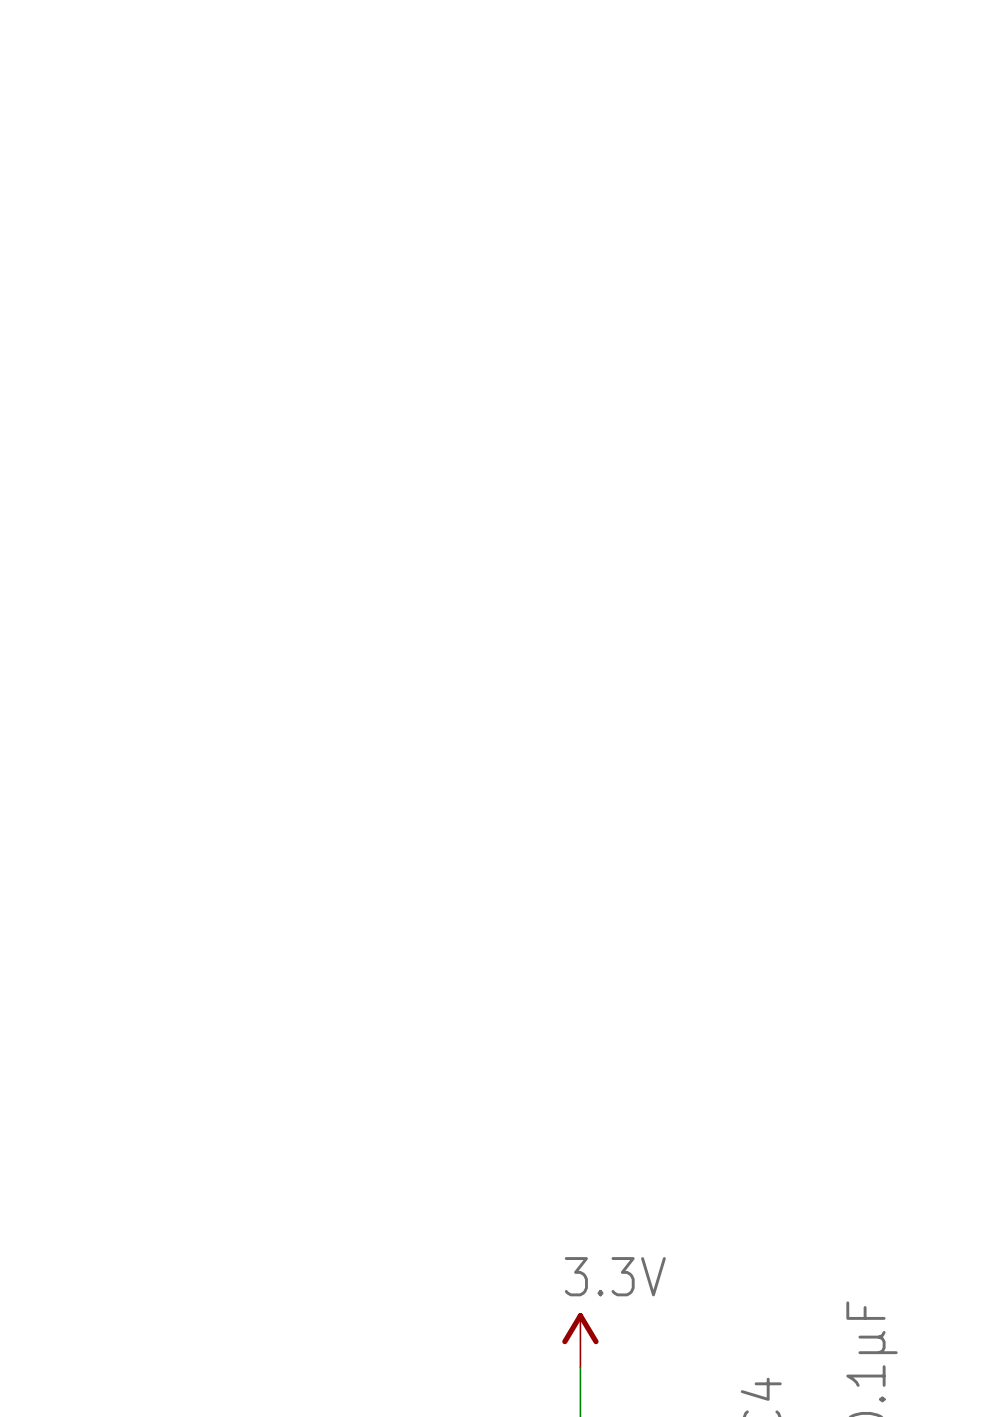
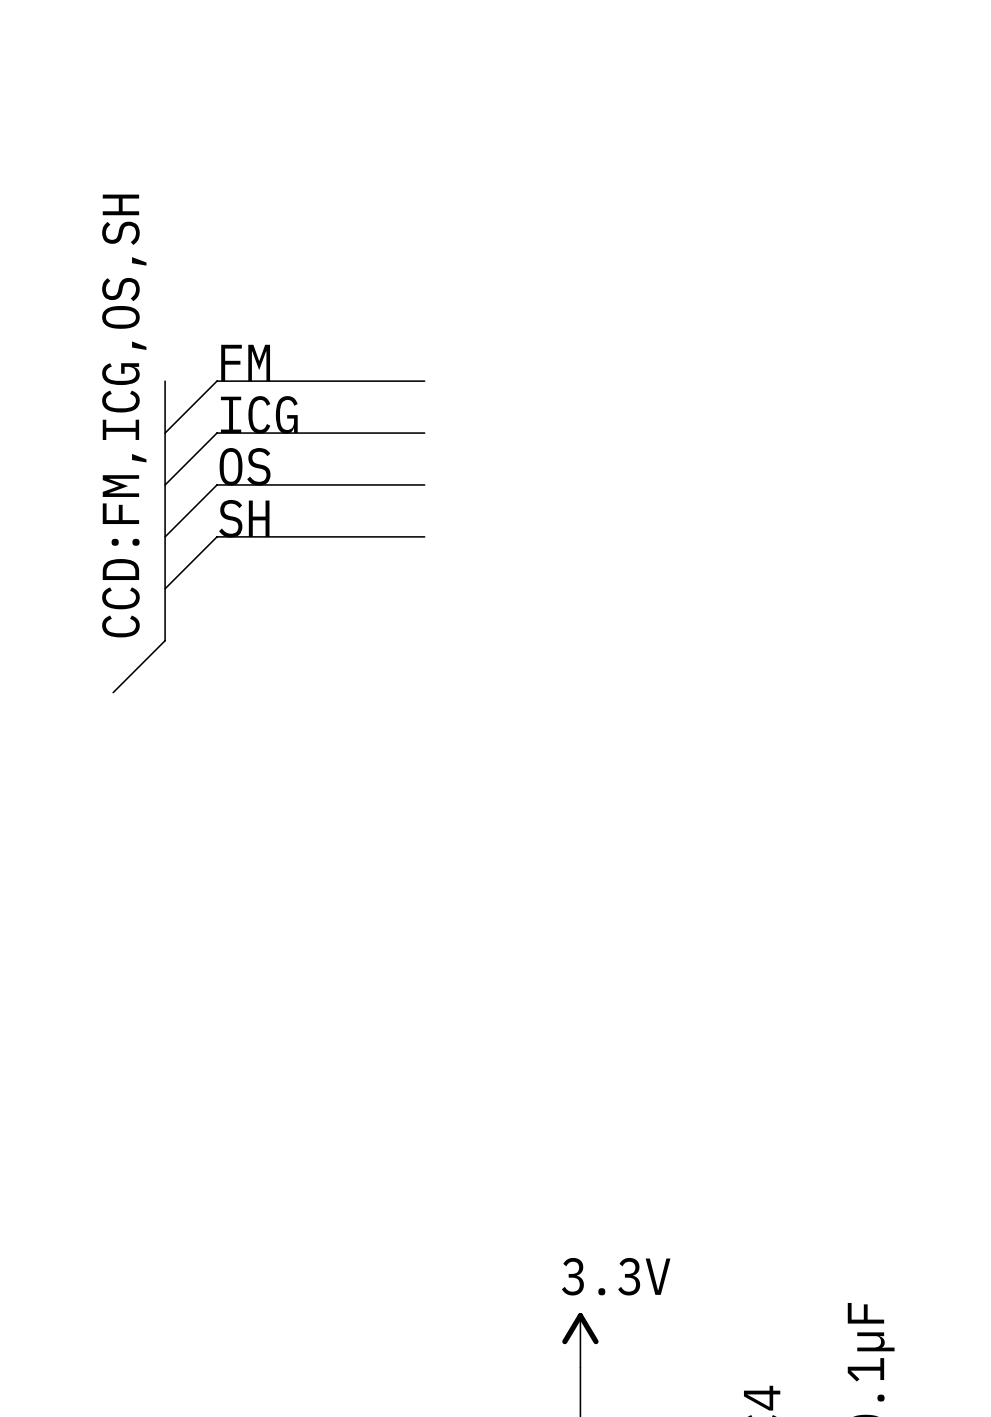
label: none -> FM (245, 362)
bus: none -> (165, 381) (165, 640) (113, 692)
wire: none -> (424, 381) (216, 381) (165, 433)
label: none -> ICG (259, 414)
label: none -> CCD:FM,ICG,OS,SH (124, 416)
wire: none -> (424, 433) (216, 433) (165, 484)
label: none -> OS (245, 466)
wire: none -> (424, 484) (216, 484) (165, 536)
label: none -> SH (244, 518)
wire: none -> (424, 536) (216, 536) (165, 588)

